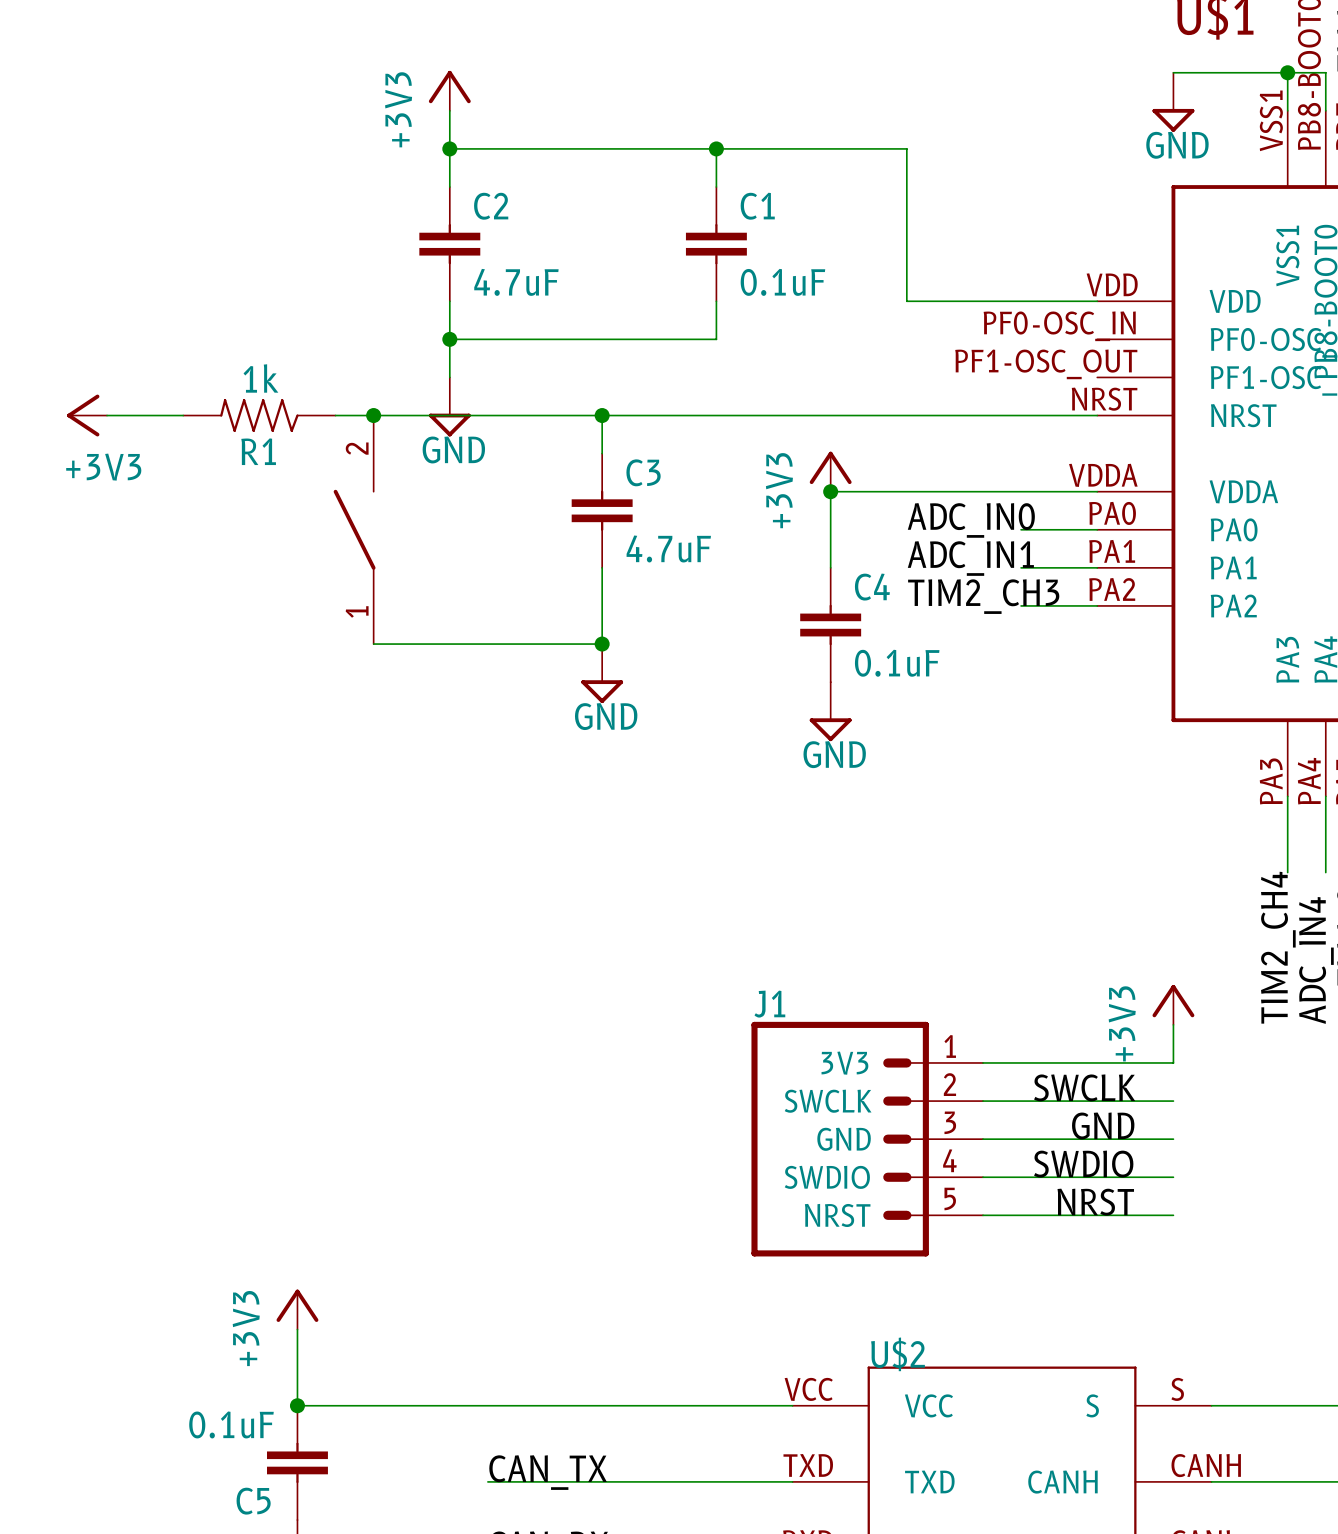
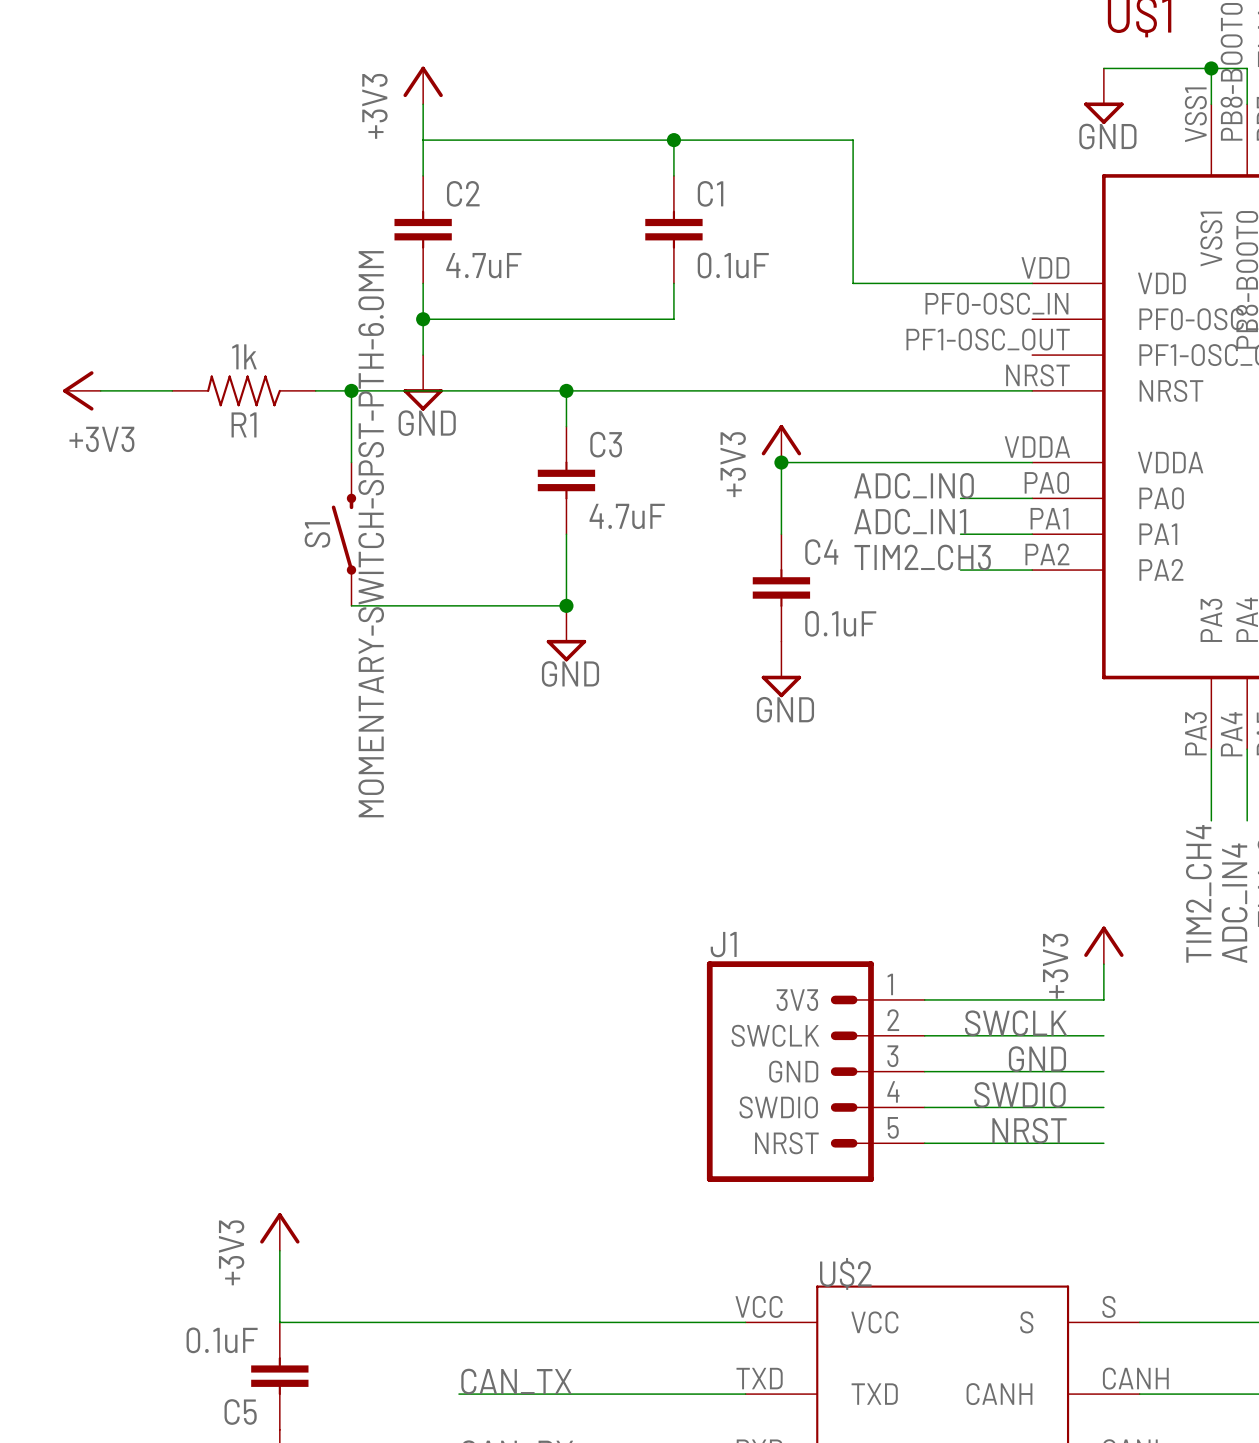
junction: (449, 148) -> none
part: (354, 529) -> none
S1: none -> MOMENTARY-SWITCH-SPST-PTH-6.0MM (343, 534)
junction: (297, 1405) -> none

